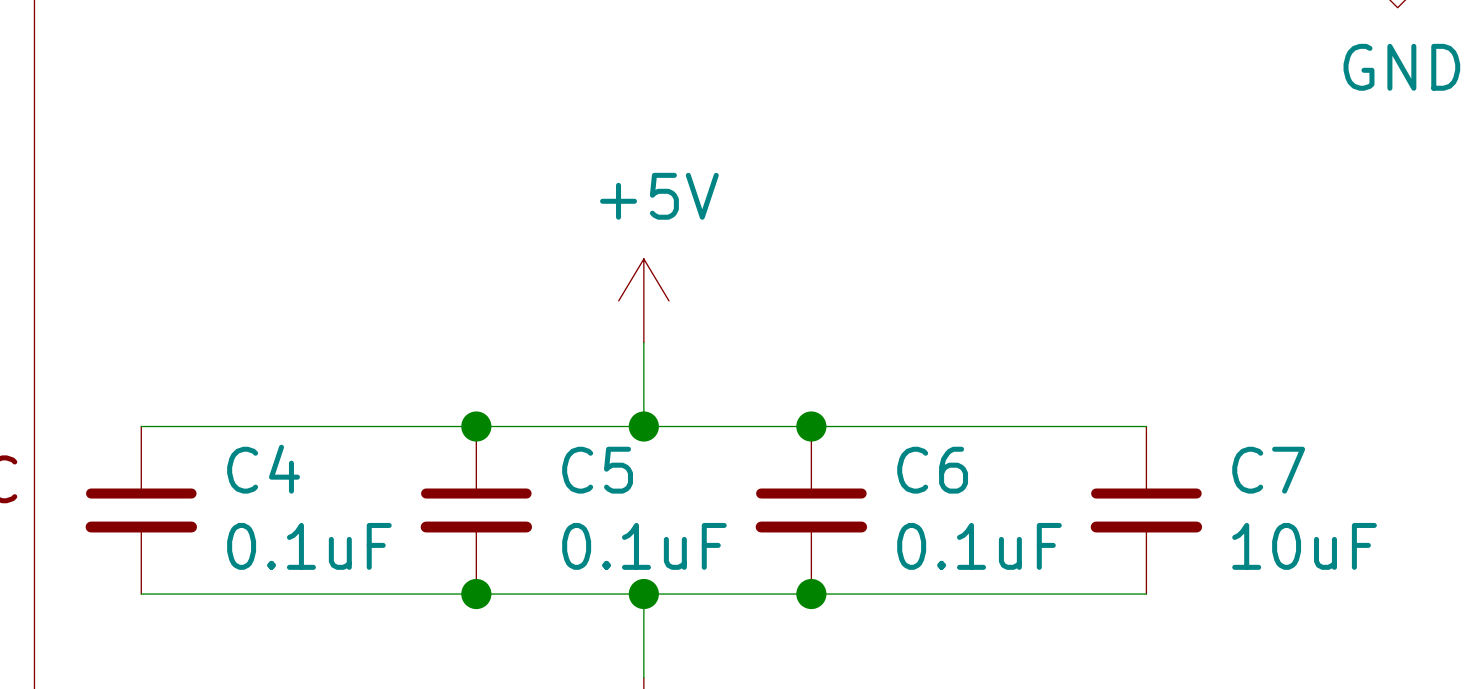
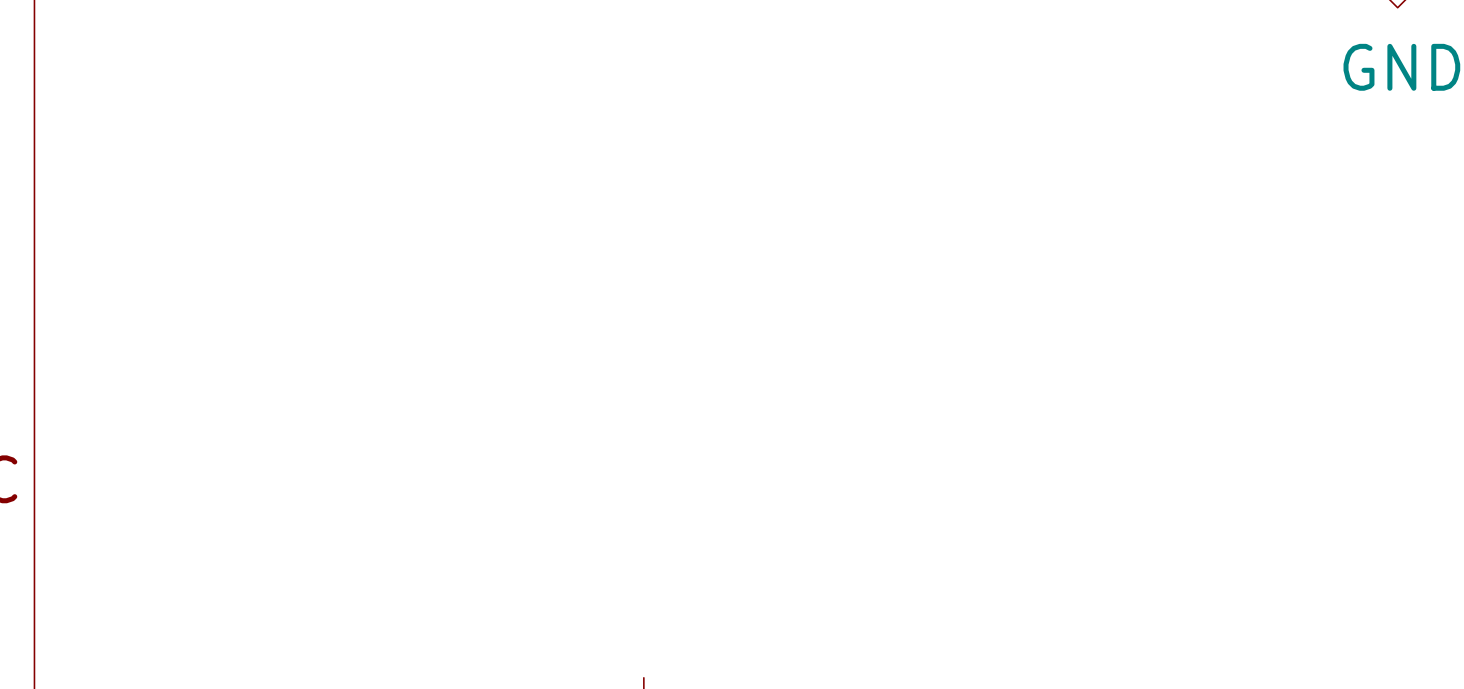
power symbol: +5V (643, 300) -> none
wire: (643, 342) (643, 426) -> none
wire: (141, 426) (1146, 426) -> none
junction: (476, 426) -> none
junction: (643, 426) -> none
junction: (811, 426) -> none
C4: 0.1uF (141, 510) -> none
C5: 0.1uF (476, 510) -> none
C6: 0.1uF (811, 510) -> none
C7: 10uF (1146, 510) -> none
wire: (141, 594) (1146, 594) -> none
junction: (476, 594) -> none
wire: (643, 594) (643, 677) -> none
junction: (643, 594) -> none
junction: (811, 594) -> none

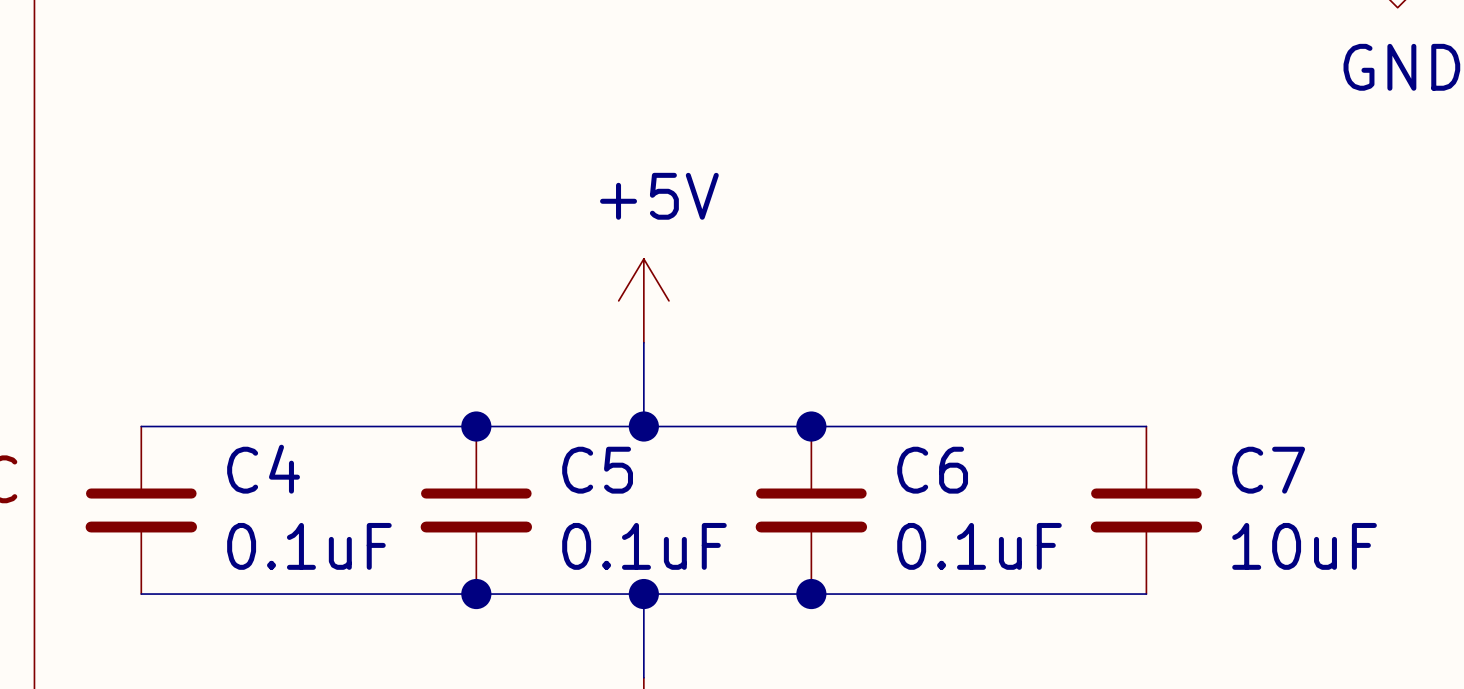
power symbol: none -> +5V (643, 300)
wire: none -> (643, 342) (643, 426)
wire: none -> (141, 426) (1146, 426)
junction: none -> (476, 426)
junction: none -> (643, 426)
junction: none -> (811, 426)
C4: none -> 0.1uF (141, 510)
C5: none -> 0.1uF (476, 510)
C6: none -> 0.1uF (811, 510)
C7: none -> 10uF (1146, 510)
wire: none -> (141, 594) (1146, 594)
junction: none -> (476, 594)
wire: none -> (643, 594) (643, 677)
junction: none -> (643, 594)
junction: none -> (811, 594)

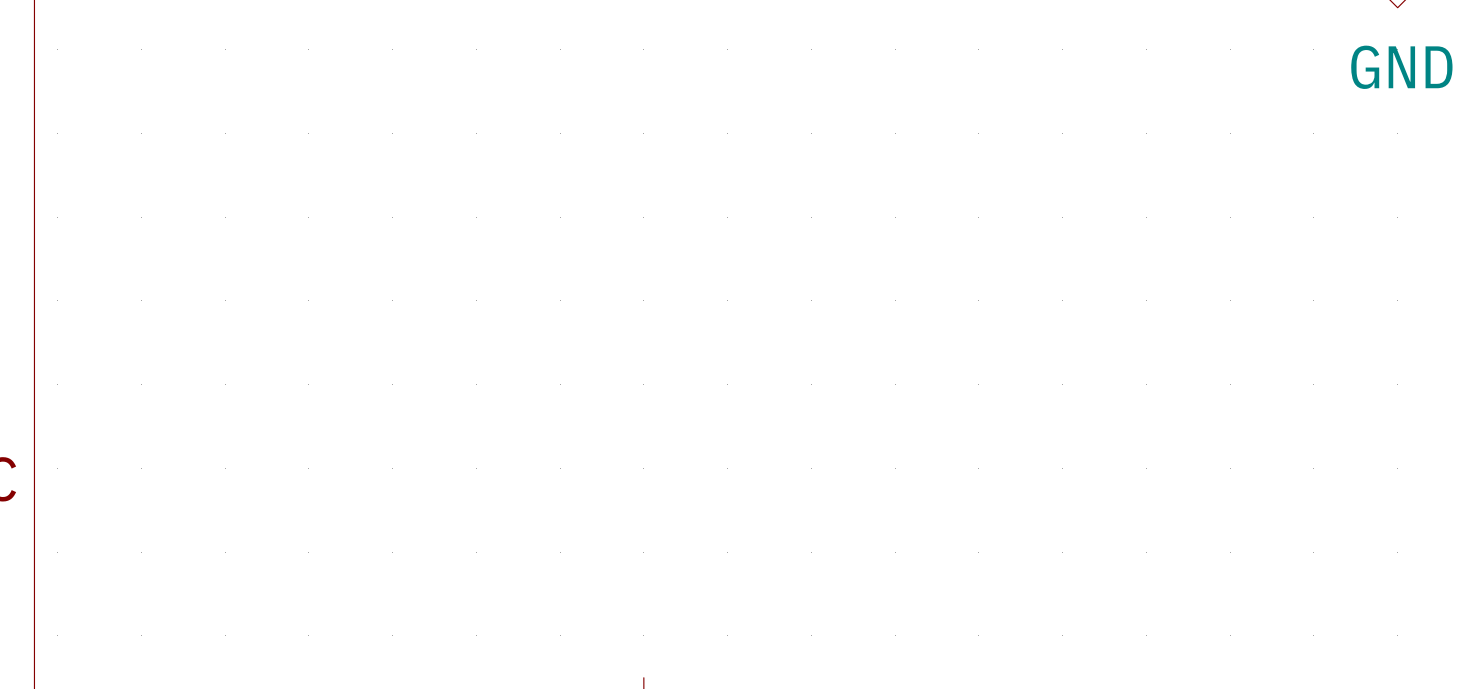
power symbol: +5V (643, 300) -> none
wire: (643, 342) (643, 426) -> none
wire: (141, 426) (1146, 426) -> none
junction: (476, 426) -> none
junction: (643, 426) -> none
junction: (811, 426) -> none
C4: 0.1uF (141, 510) -> none
C5: 0.1uF (476, 510) -> none
C6: 0.1uF (811, 510) -> none
C7: 10uF (1146, 510) -> none
wire: (141, 594) (1146, 594) -> none
junction: (476, 594) -> none
wire: (643, 594) (643, 677) -> none
junction: (643, 594) -> none
junction: (811, 594) -> none

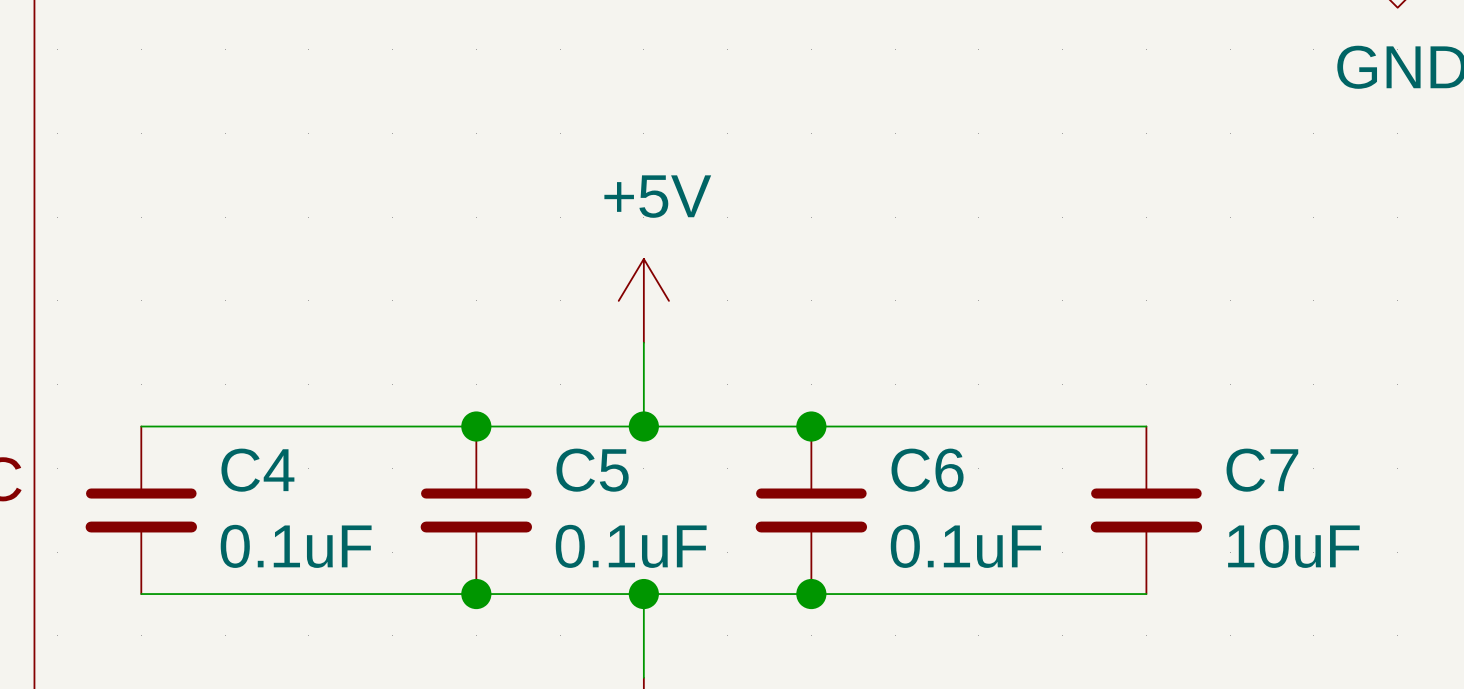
power symbol: none -> +5V (643, 300)
wire: none -> (643, 342) (643, 426)
wire: none -> (141, 426) (1146, 426)
junction: none -> (476, 426)
junction: none -> (643, 426)
junction: none -> (811, 426)
C4: none -> 0.1uF (141, 510)
C5: none -> 0.1uF (476, 510)
C6: none -> 0.1uF (811, 510)
C7: none -> 10uF (1146, 510)
wire: none -> (141, 594) (1146, 594)
junction: none -> (476, 594)
wire: none -> (643, 594) (643, 677)
junction: none -> (643, 594)
junction: none -> (811, 594)

